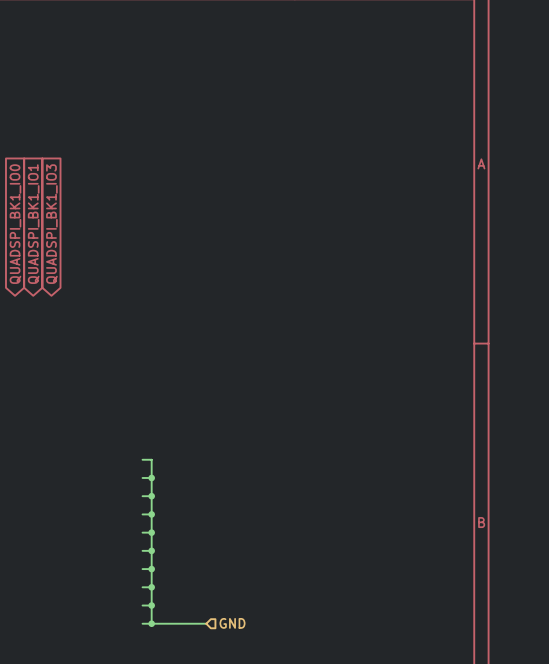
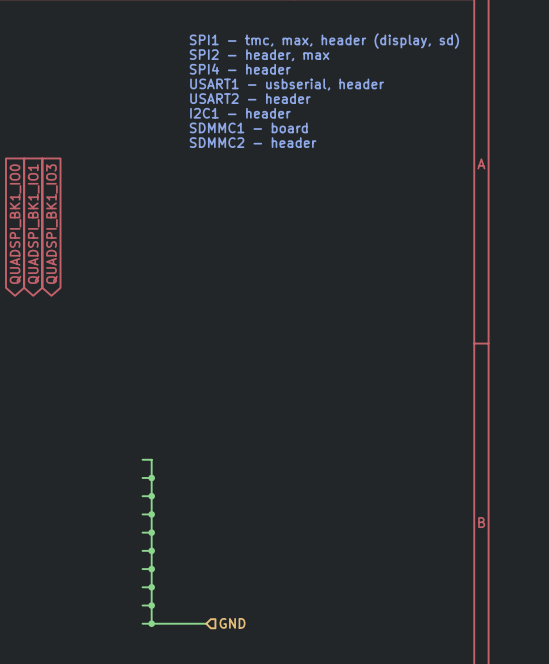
text: none -> SPI1 - tmc, max, header (display, sd) (324, 41)
text: none -> SPI2 - header, max (259, 55)
text: none -> SPI4 - header (240, 69)
text: none -> USART1 - usbserial, header (287, 84)
text: none -> USART2 - header (250, 98)
text: none -> I2C1 - header (240, 113)
text: none -> SDMMC1 - board (248, 127)
text: none -> SDMMC2 - header (253, 142)

